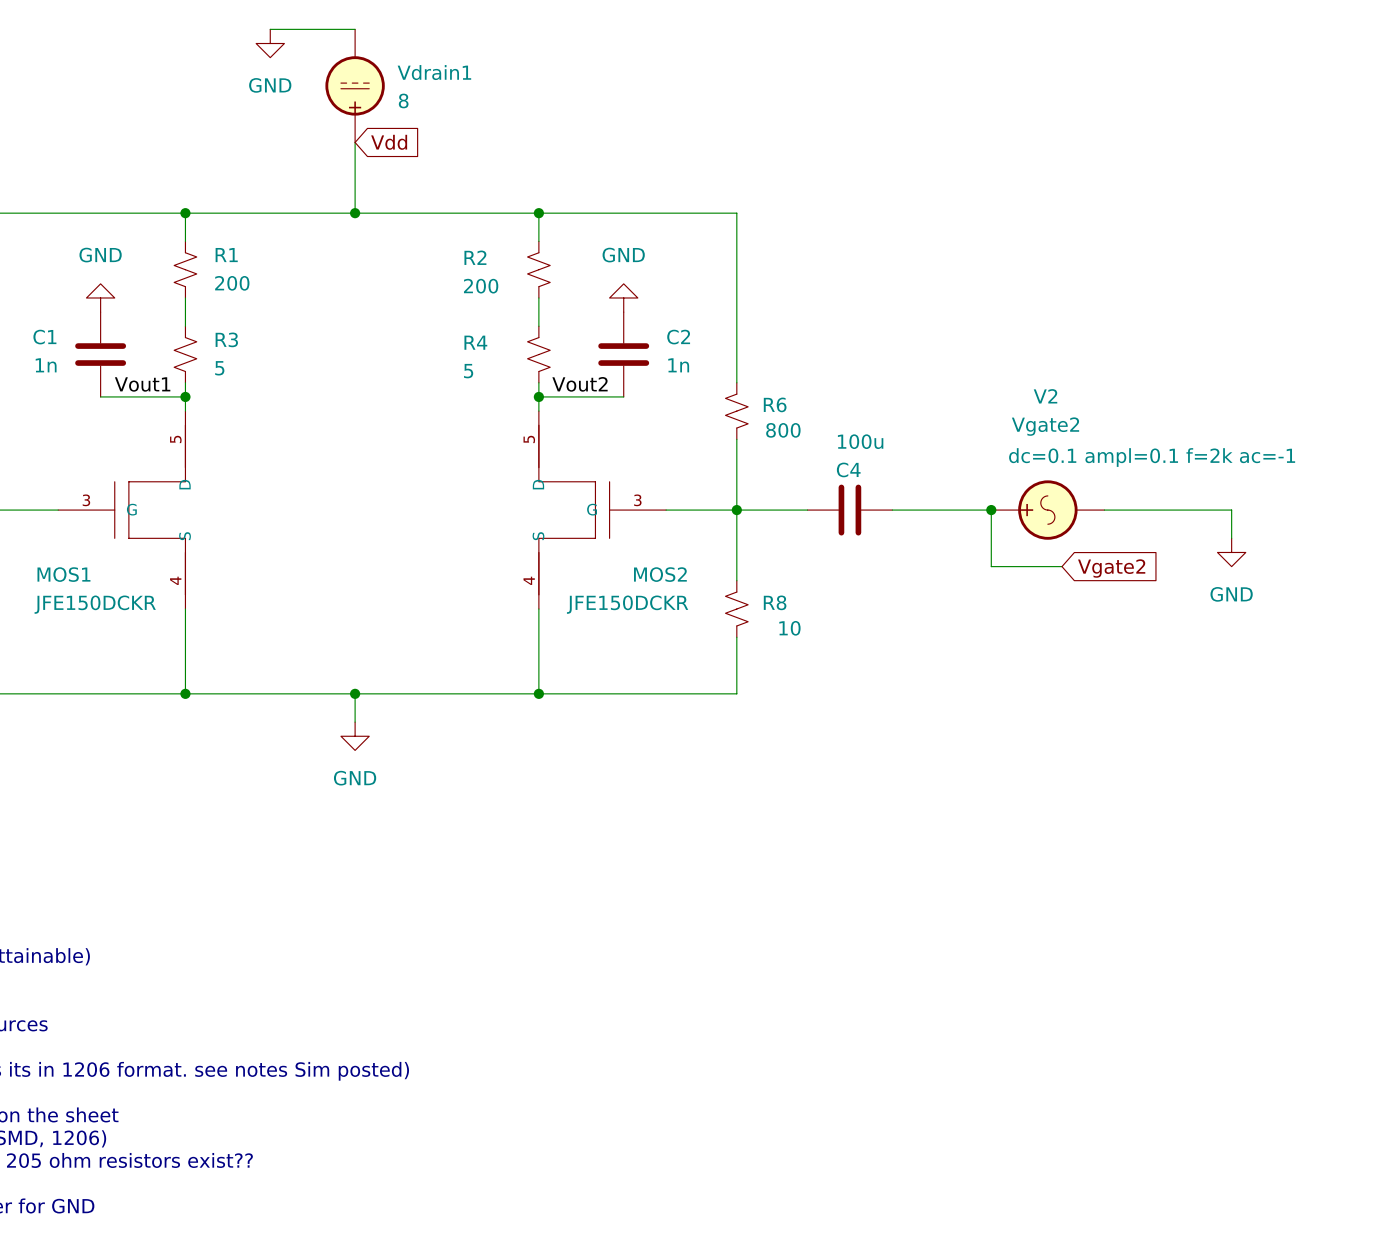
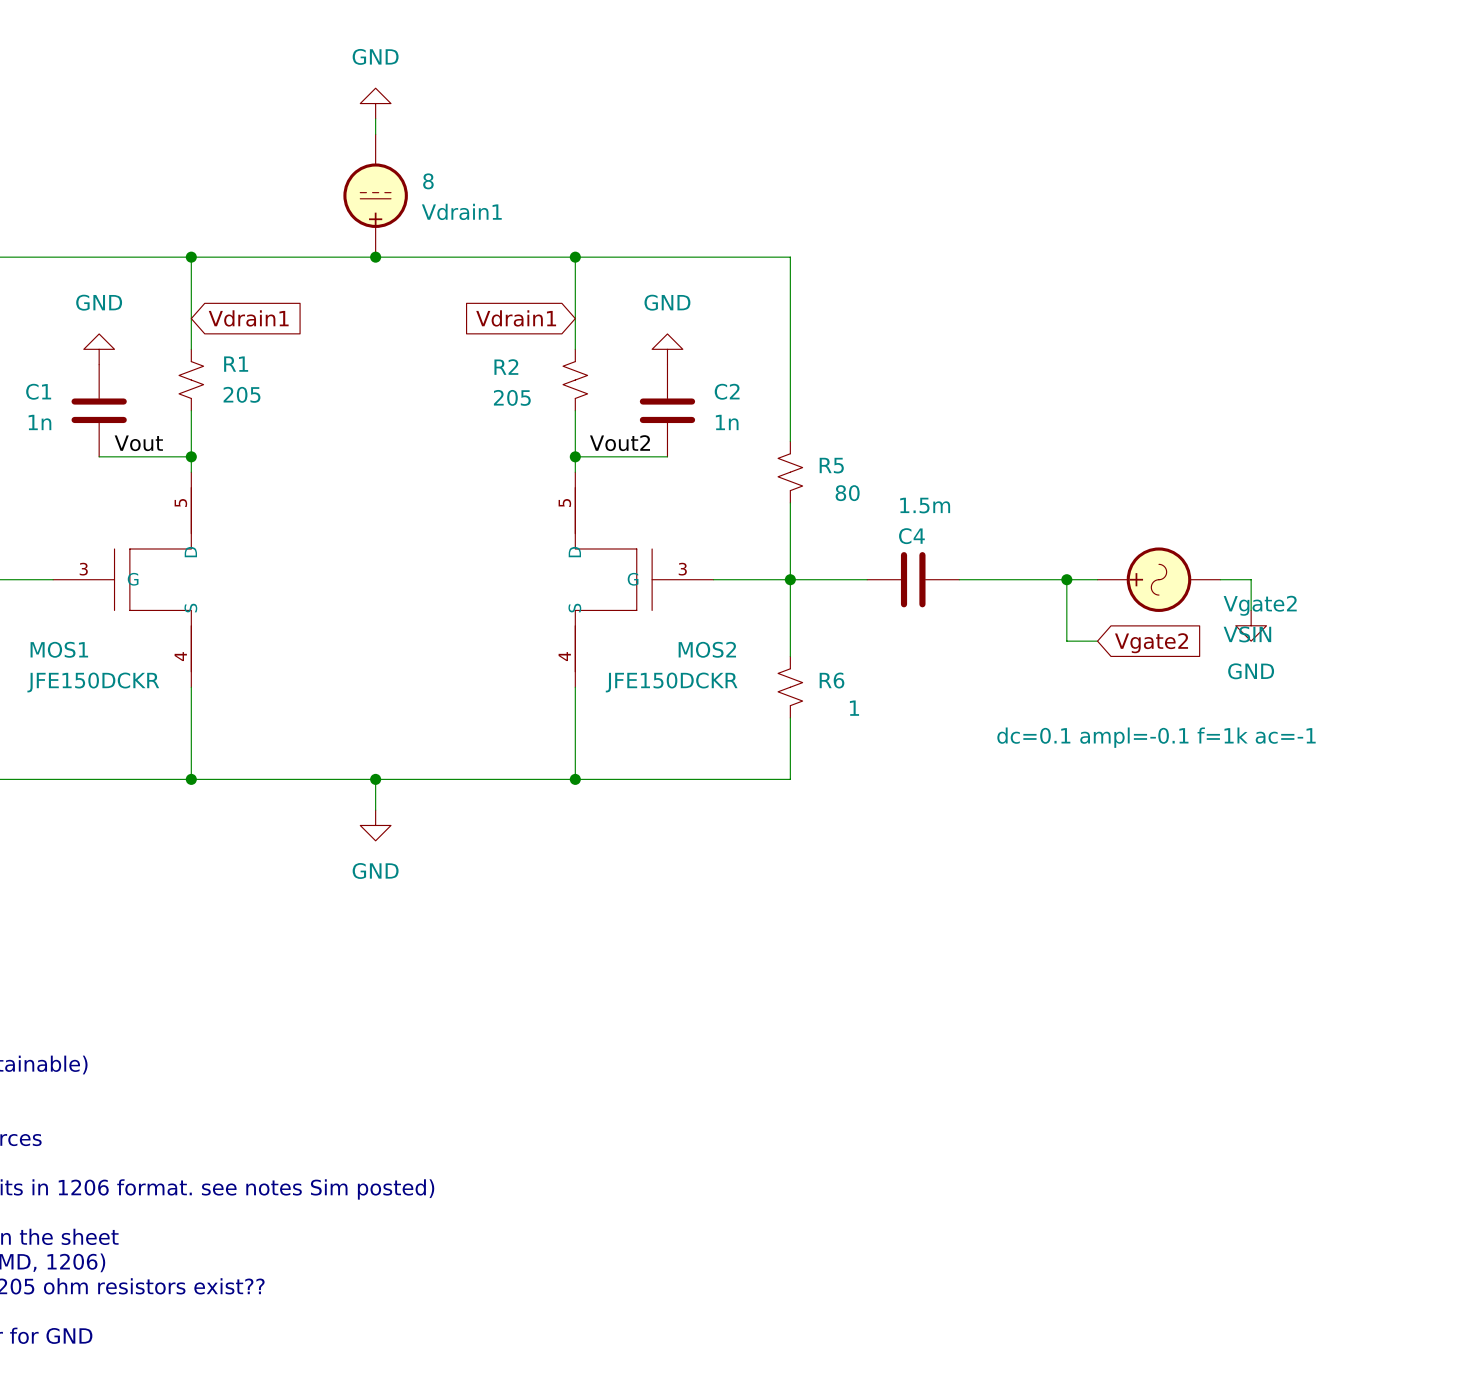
wire: (270, 29) (355, 29) -> none
power symbol rotation: 0° (270, 43) -> 180° (375, 103)
power symbol position: GND (270, 43) -> GND (375, 103)
Vdrain1 name position: Vdrain1 (434, 72) -> Vdrain1 (461, 211)
Vdrain1 position: (355, 85) -> (375, 195)
Vdrain1 value position: 8 (403, 100) -> 8 (428, 181)
global label: Vdd (389, 142) -> none
R1 position: (185, 269) -> (191, 380)
global label: none -> Vdrain1 (248, 318)
global label: none -> Vdrain1 (516, 318)
R2 position: (538, 269) -> (575, 380)
R1 value: 200 (232, 283) -> 205 (242, 394)
R2 value: 200 (481, 286) -> 205 (512, 397)
wire: (185, 297) (185, 326) -> (191, 349) (191, 287)
wire: none -> (191, 410) (191, 441)
R3: 5 (185, 354) -> none
wire: none -> (575, 410) (575, 441)
R4: 5 (538, 354) -> none
label: Vout1 (142, 384) -> Vout (138, 443)
R6 name: R6 (775, 404) -> R5 (831, 465)
R6 value: 800 (783, 430) -> 80 (847, 493)
C4 value: 100u (860, 441) -> 1.5m (925, 505)
V2: Vgate2 (1047, 510) -> none
Vgate2: none -> VSIN (1158, 579)
wire: (1160, 510) (1231, 510) (1231, 538) -> (1251, 579) (1251, 610)
power symbol position: GND (1231, 552) -> GND (1251, 625)
wire: (1019, 566) (1061, 566) -> none
global label position: Vgate2 (1111, 568) -> Vgate2 (1151, 643)
R8 name: R8 (775, 602) -> R6 (831, 680)
R8 value: 10 (789, 628) -> 1 (854, 708)

